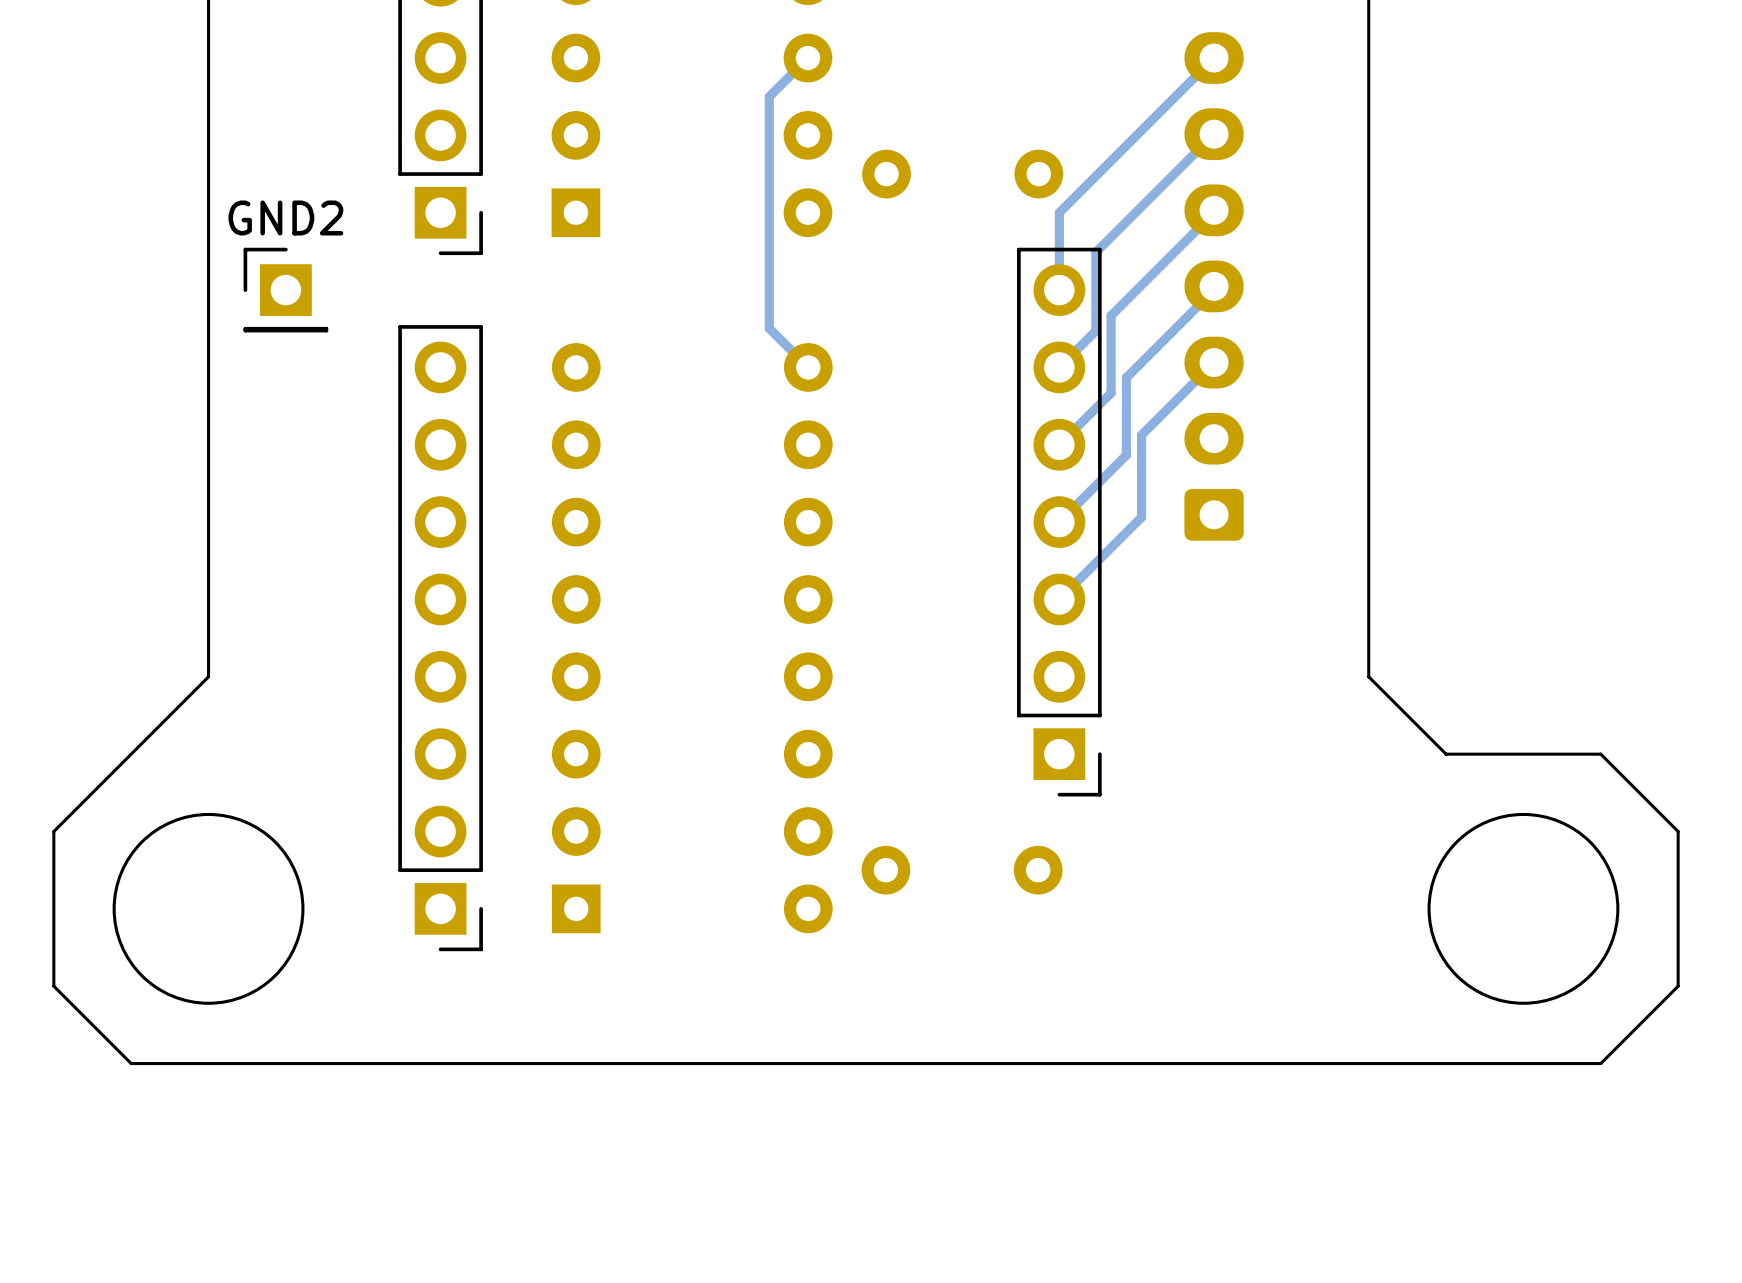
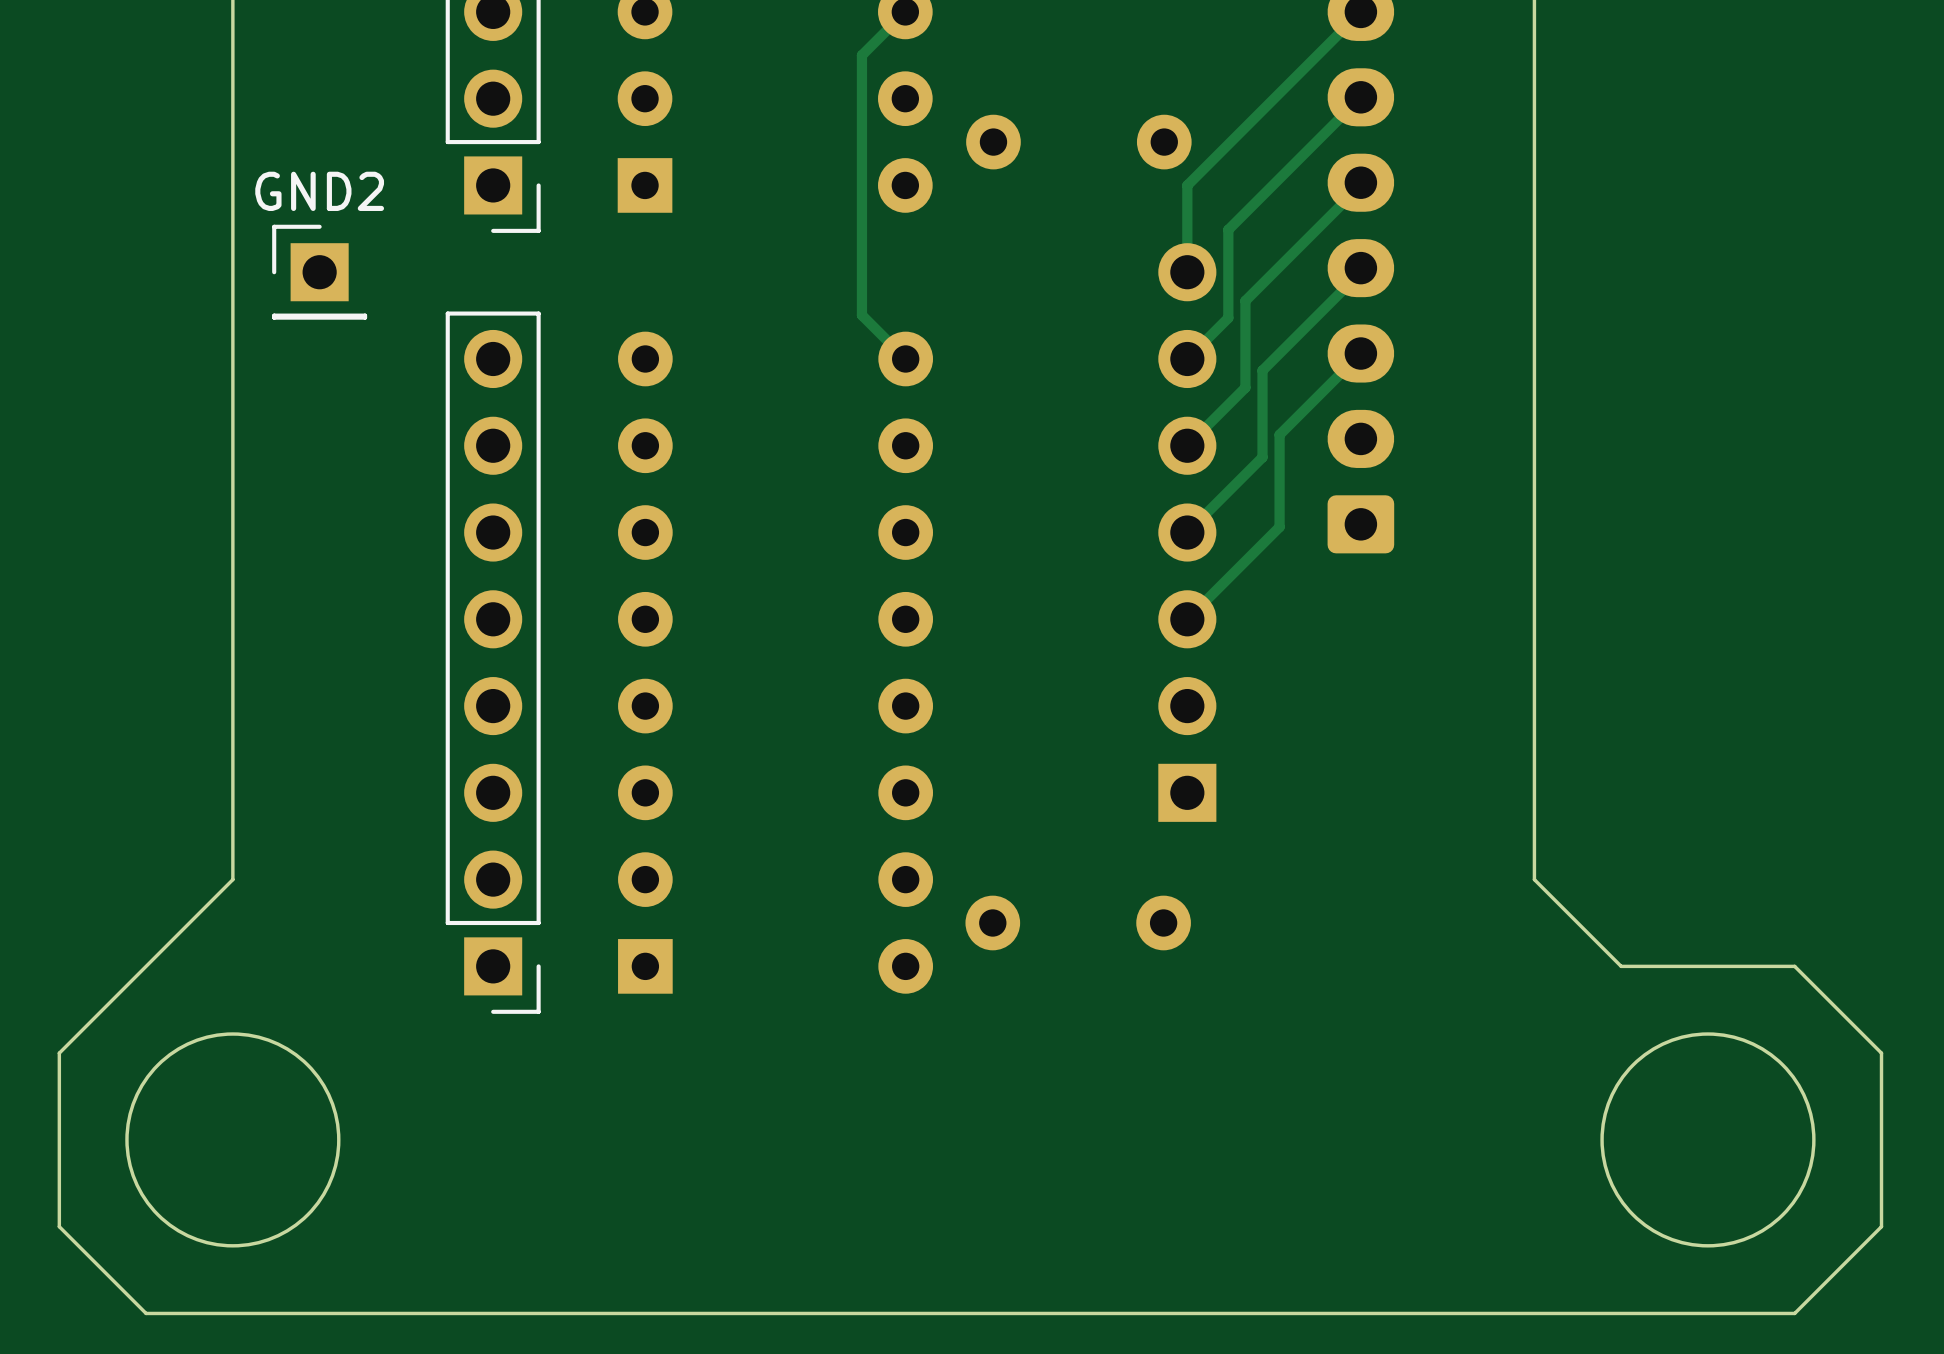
part side: bottom (1059, 522) -> top (1187, 532)
board edge: (1368, 676) (1446, 754) (1600, 754) (1678, 831) (1678, 986) (1600, 1063) (131, 1063) (53, 986) (53, 831) (208, 676) -> (1534, 706) (1534, 879) (1621, 966) (1794, 966) (1881, 1053) (1881, 1226) (1794, 1313) (146, 1313) (59, 1226) (59, 1053) (232, 879) (232, 706)
round board edge position: (208, 908) -> (232, 1139)
round board edge position: (1523, 908) -> (1707, 1139)

